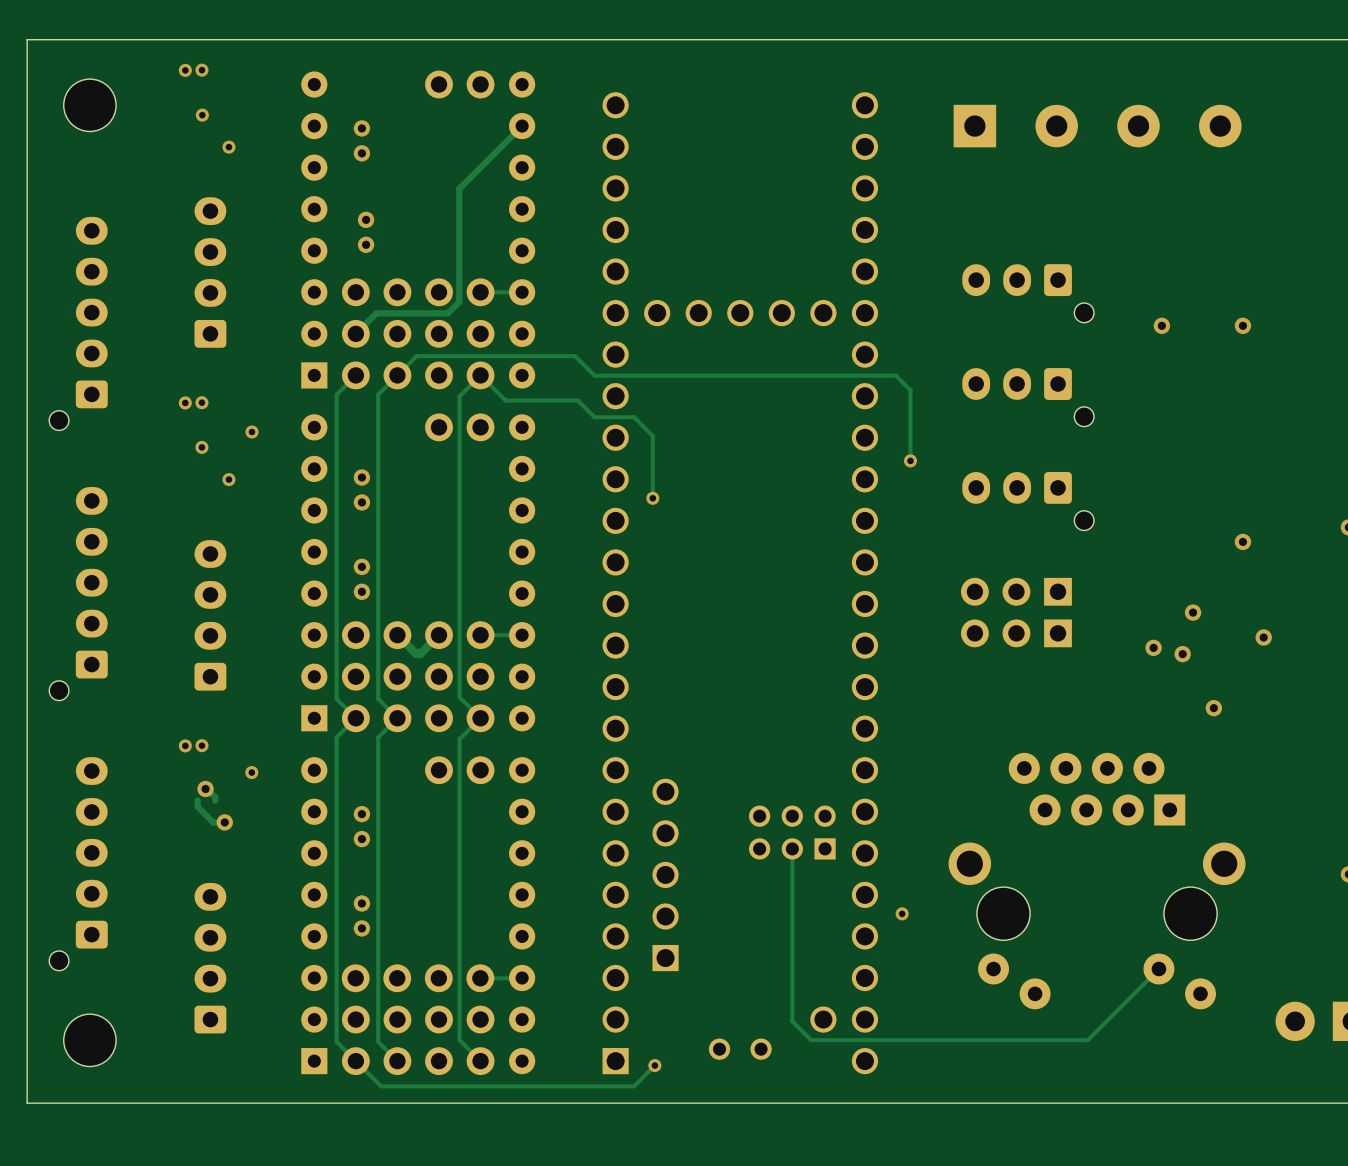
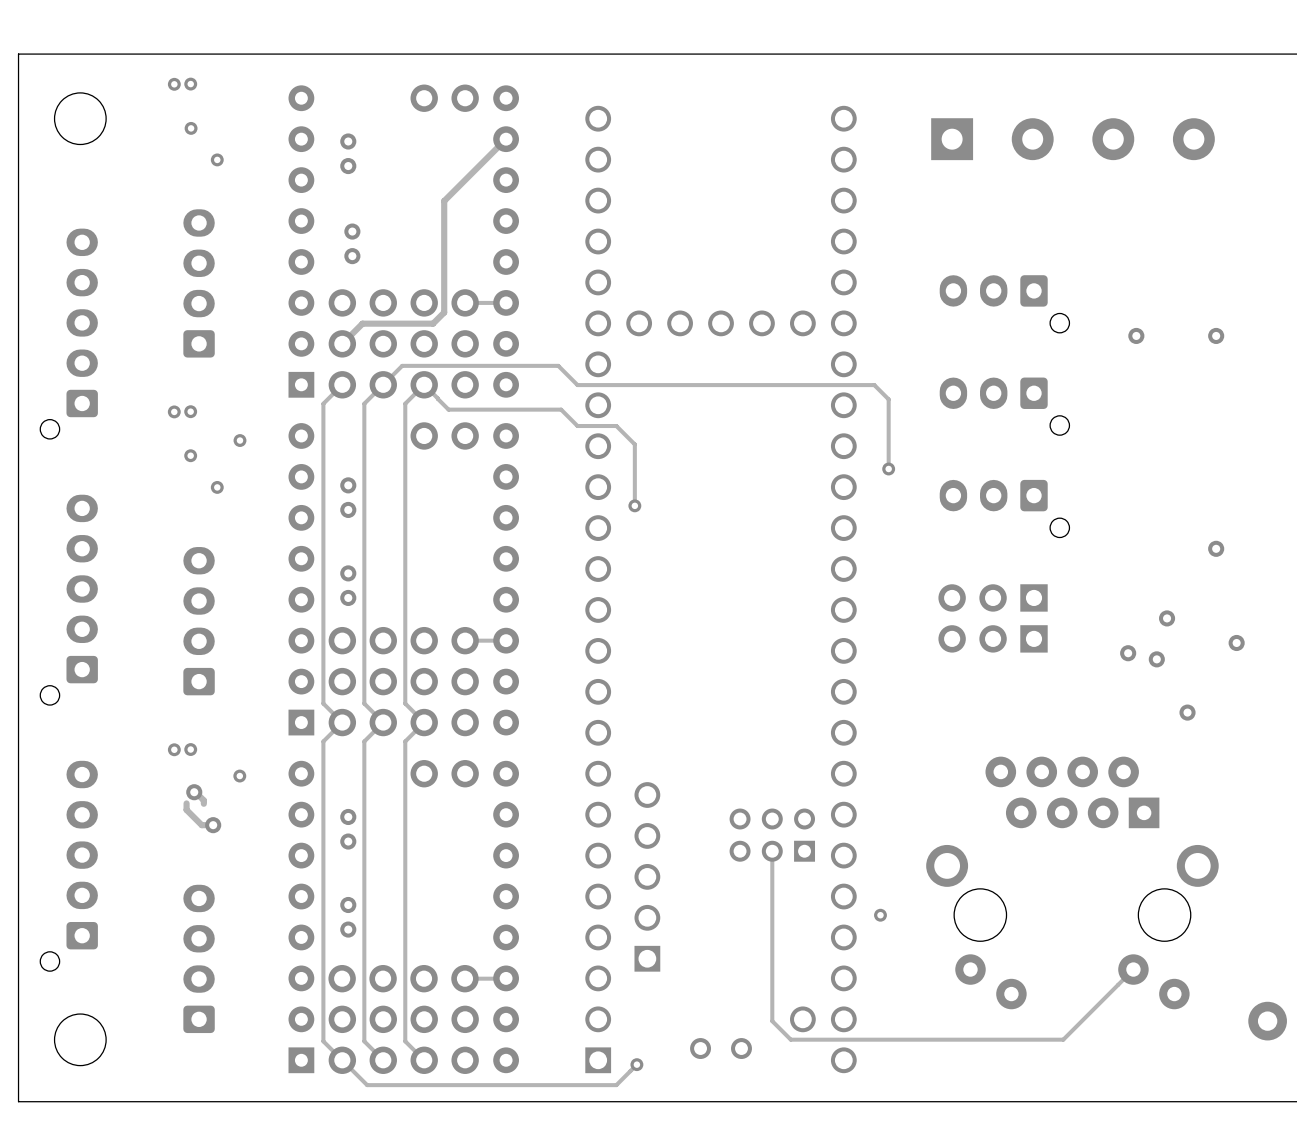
track: (505, 400) (480, 375) (459, 396) (459, 697) (480, 718) (459, 739) (459, 1040) (480, 1061) -> (489, 409) (448, 409) (424, 384) (405, 403) (405, 703) (424, 722) (405, 741) (405, 1041) (424, 1060)
track: (397, 635) (415, 653) (420, 654) (438, 635) -> none

